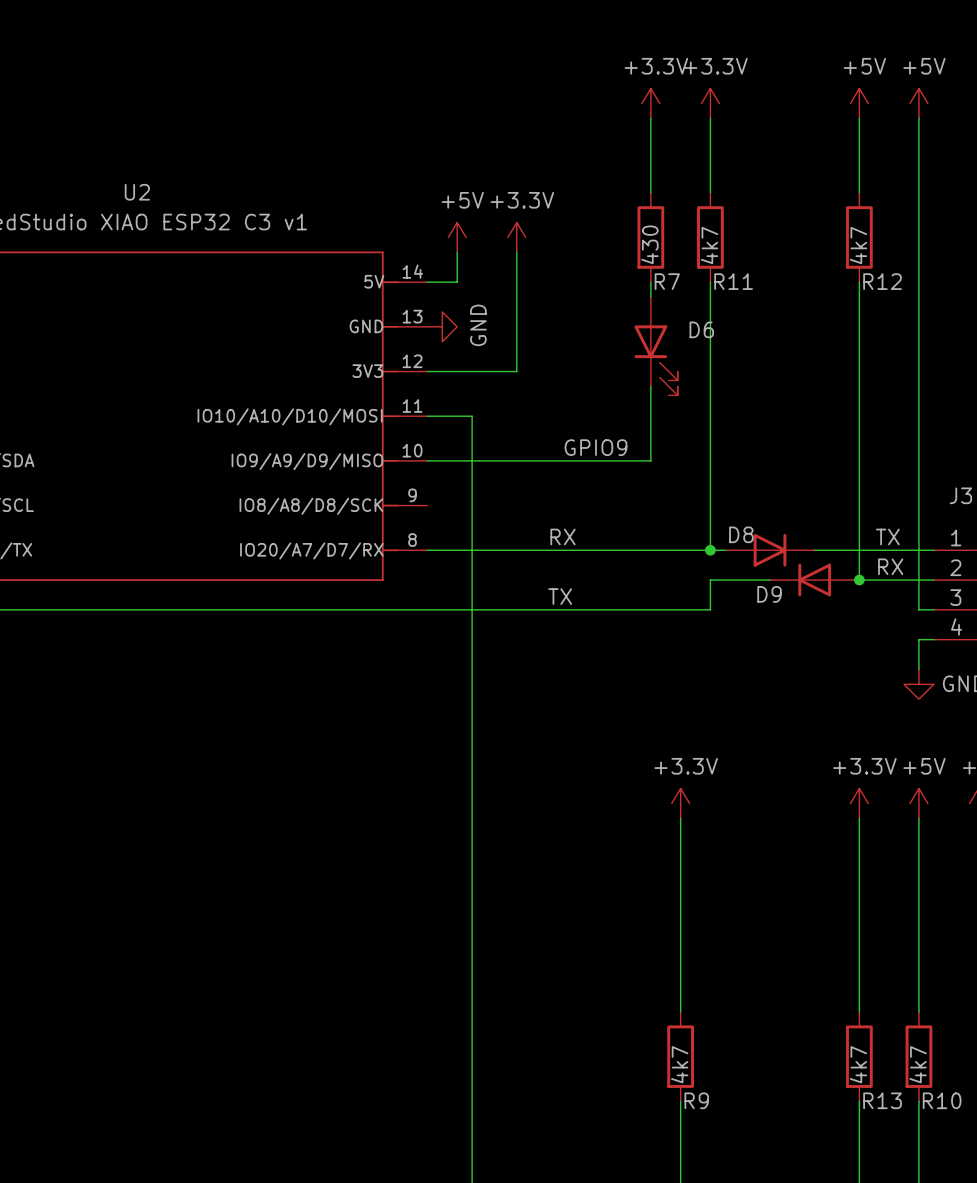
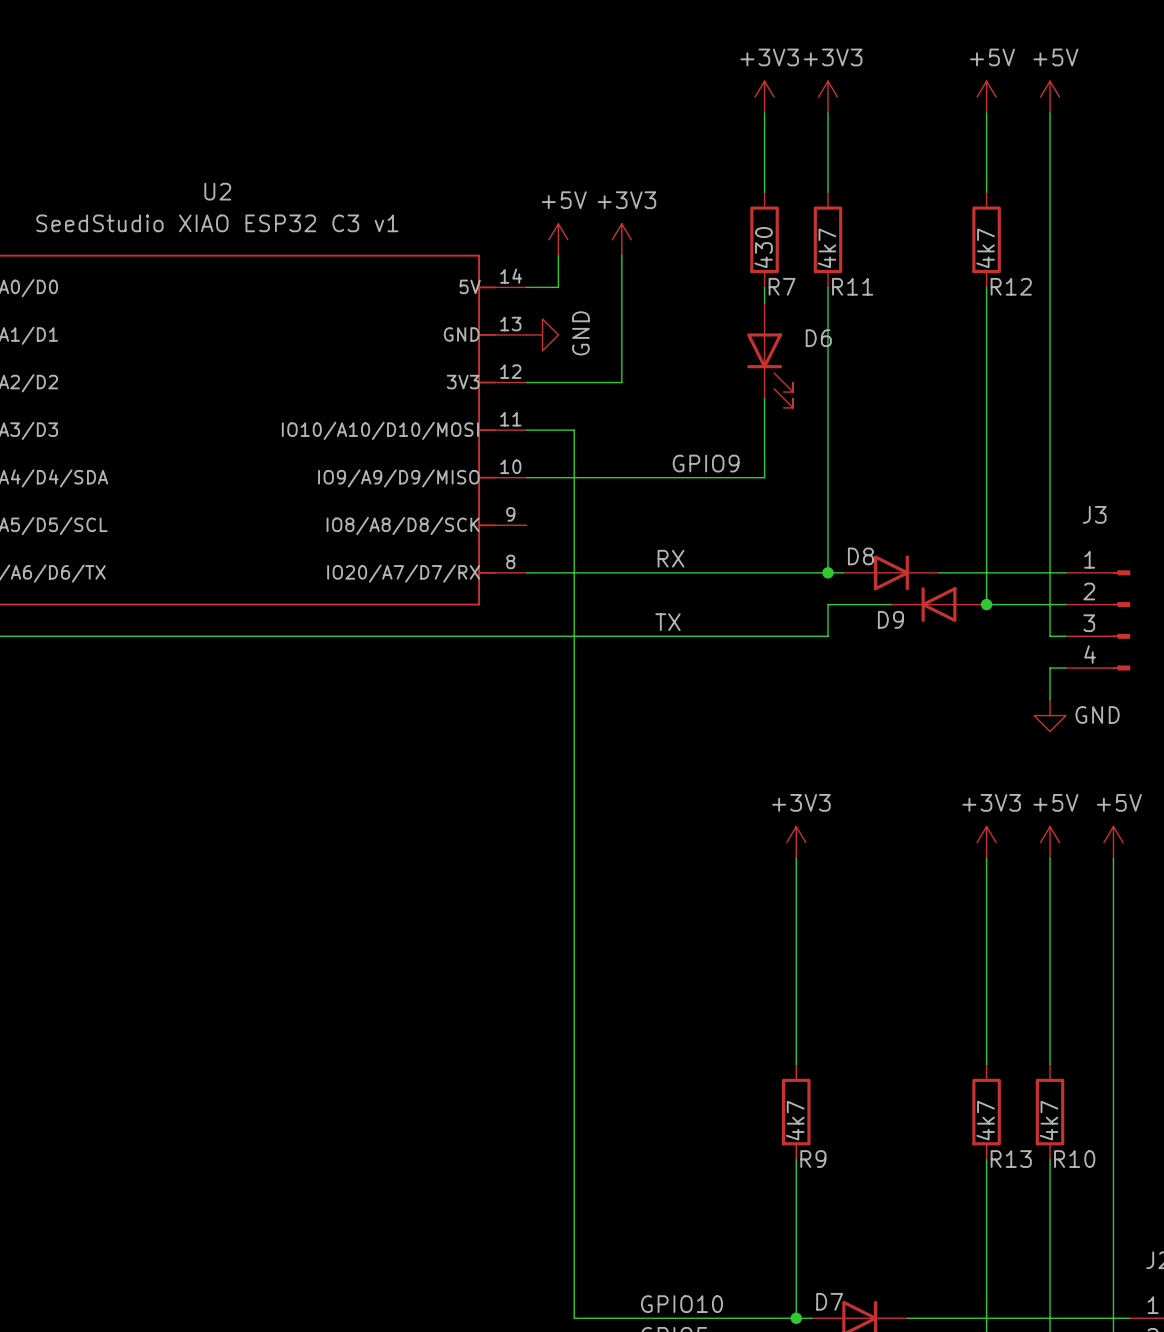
power symbol: +3.3V (650, 103) -> +3V3 (764, 97)
power symbol: +3.3V (710, 103) -> +3V3 (827, 97)
power symbol: +3.3V (516, 237) -> +3V3 (621, 239)
label: TX (887, 536) -> none
label: RX (890, 566) -> none
power symbol: +3.3V (680, 803) -> +3V3 (796, 842)
power symbol: +3.3V (859, 803) -> +3V3 (986, 842)

